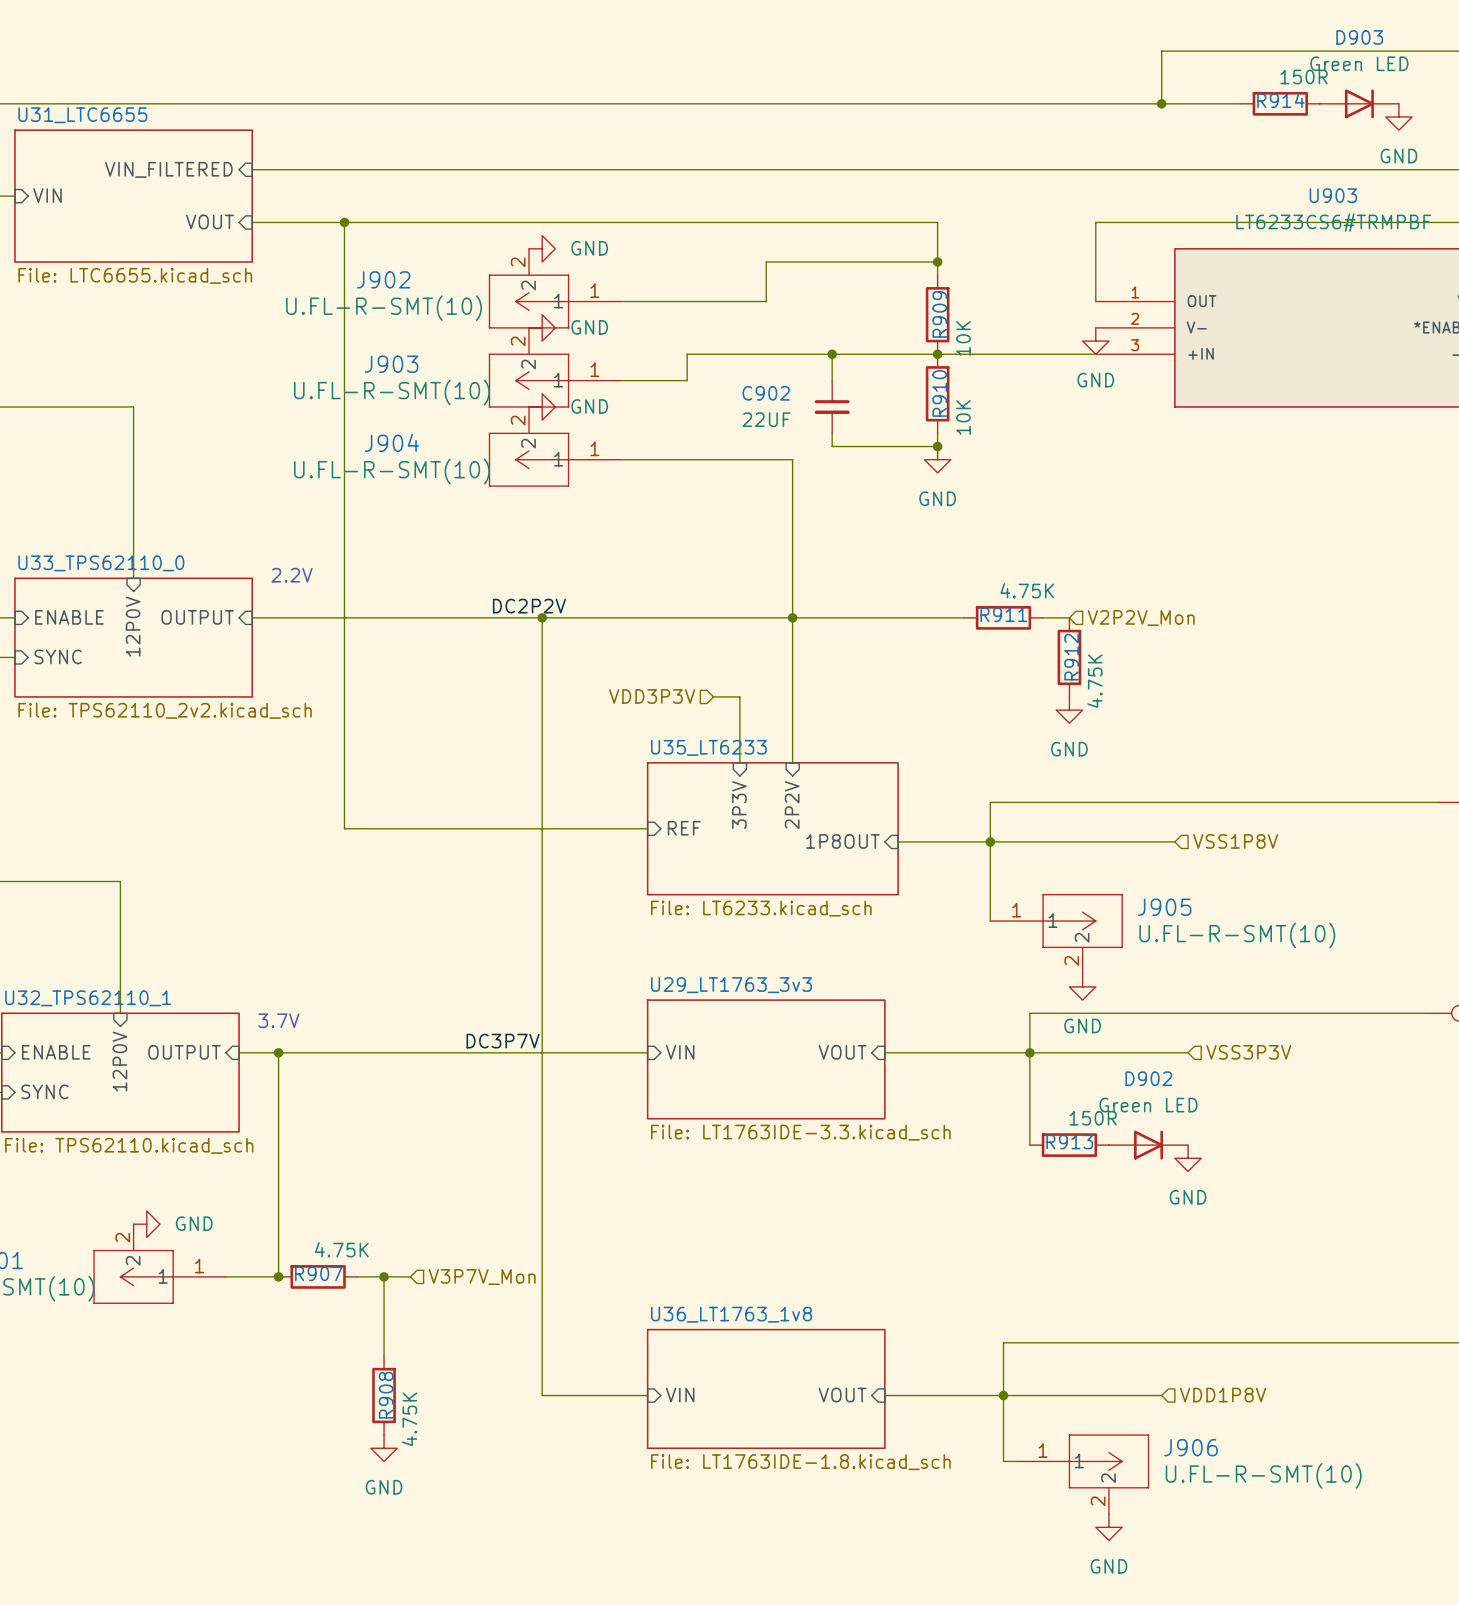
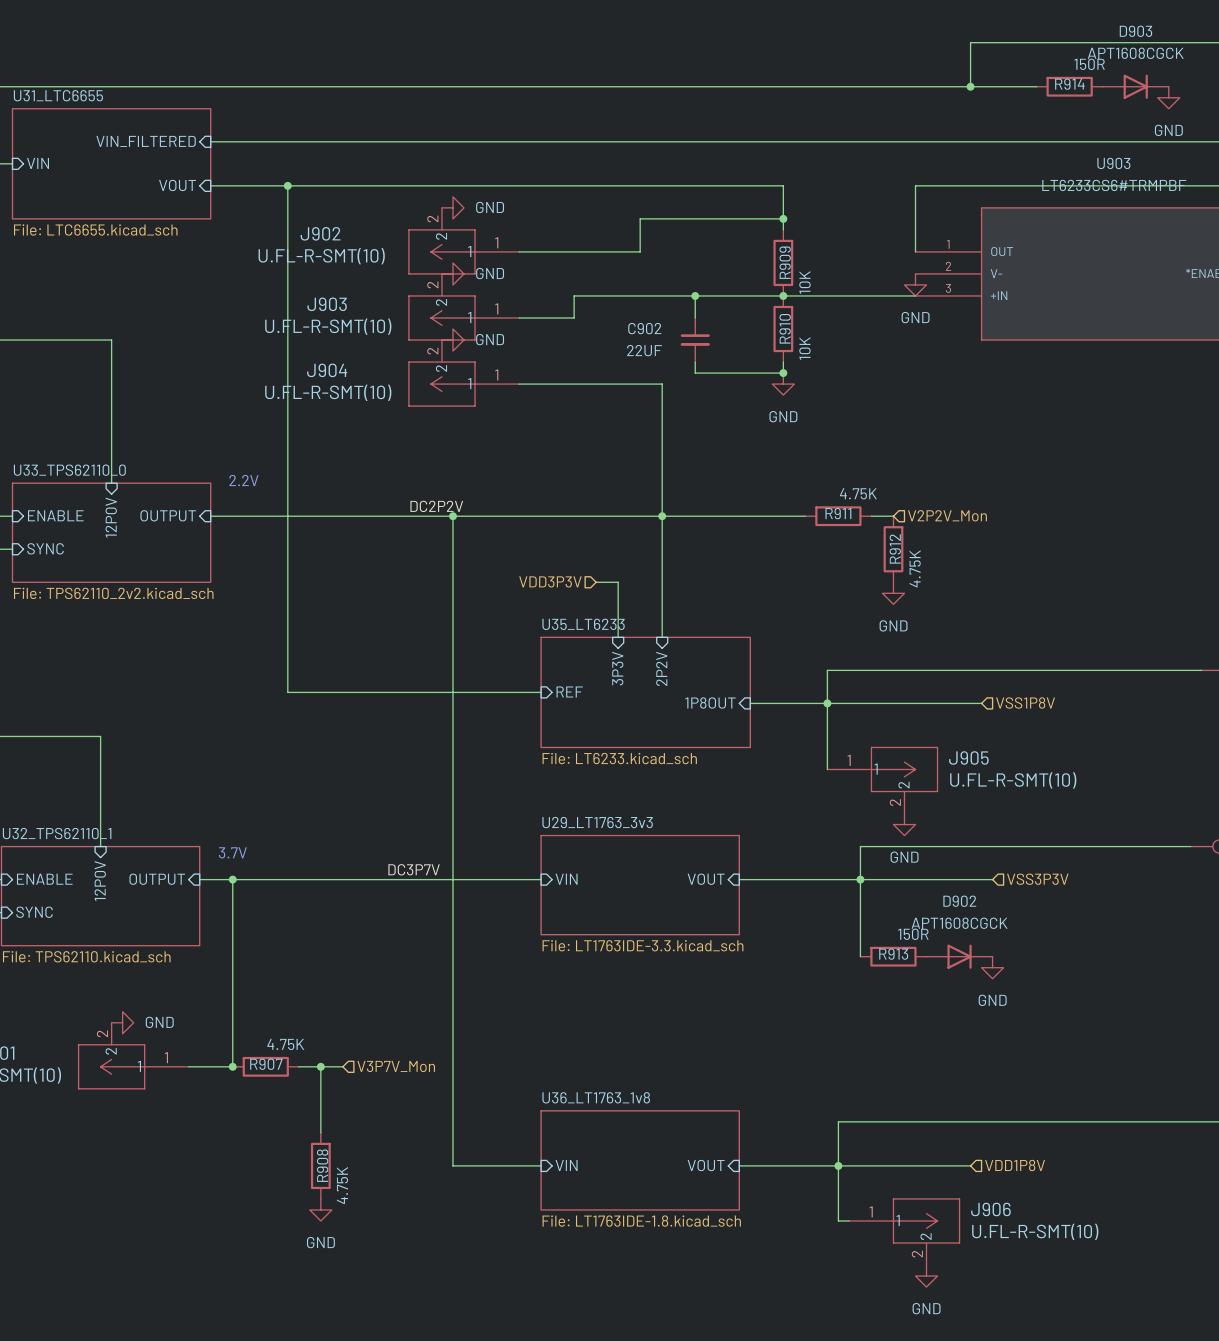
D903 value: Green LED (1359, 63) -> APT1608CGCK (1135, 53)
D902 value: Green LED (1148, 1105) -> APT1608CGCK (959, 923)

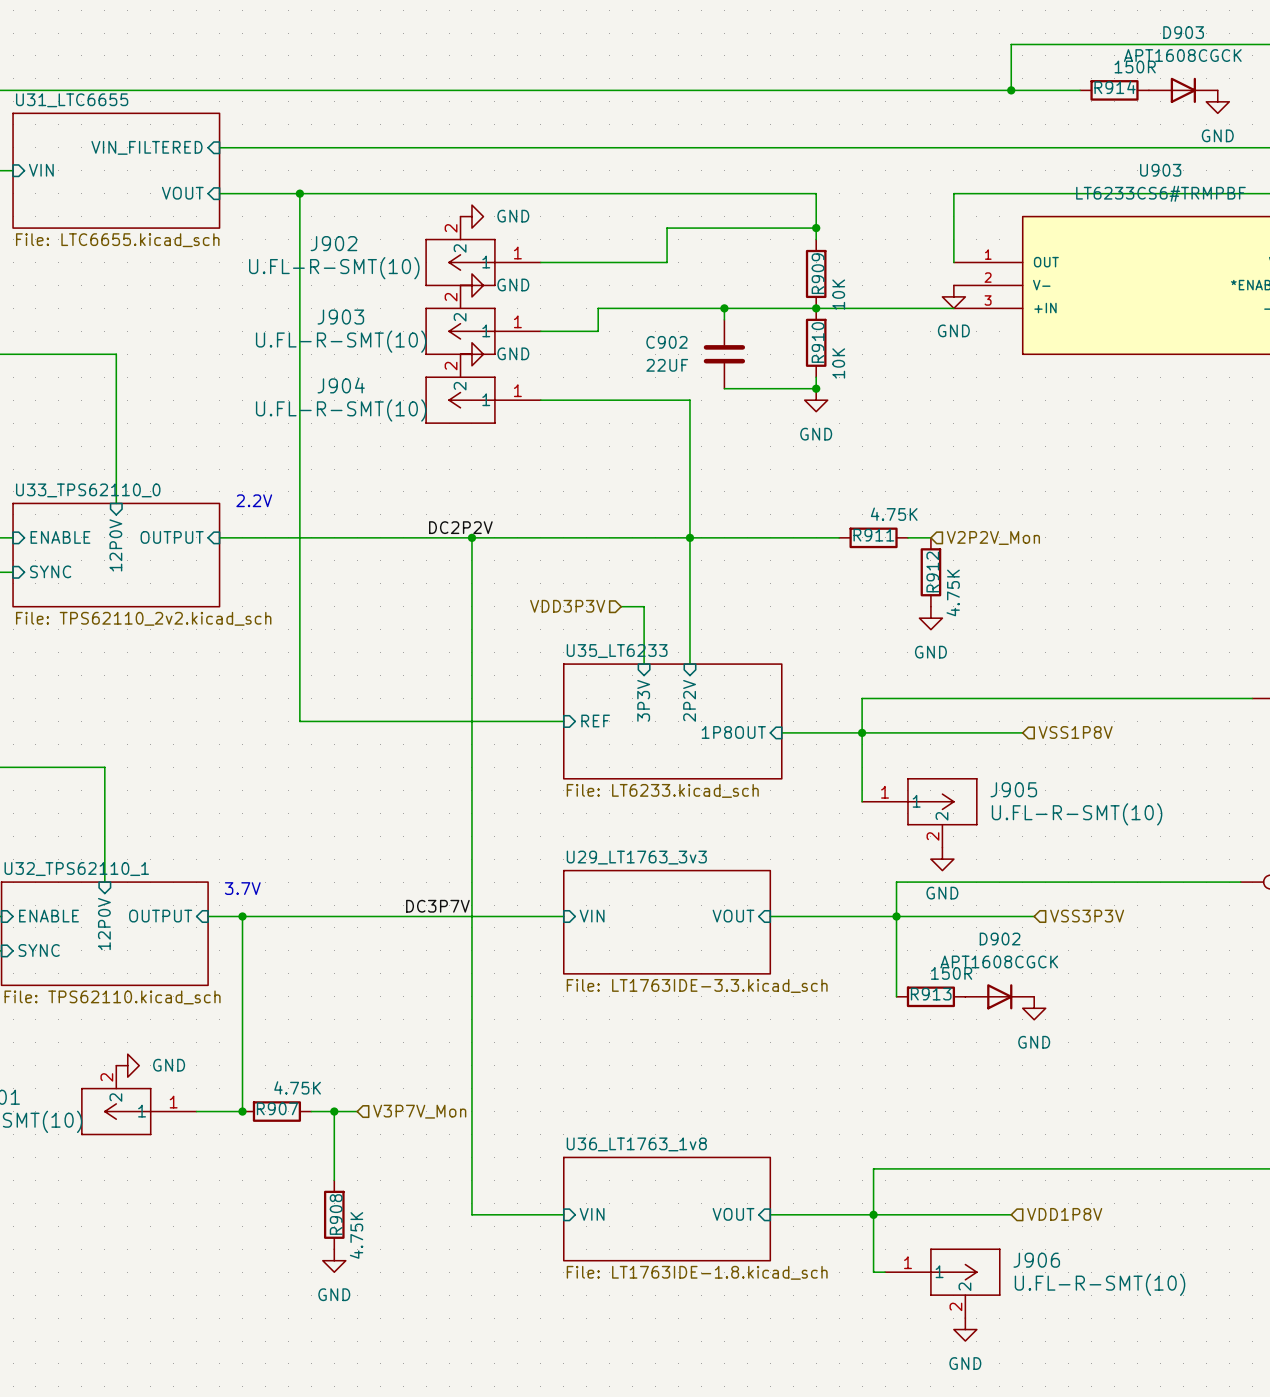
C902 symbol: [680, 318, 710, 363] -> [703, 319, 746, 389]

